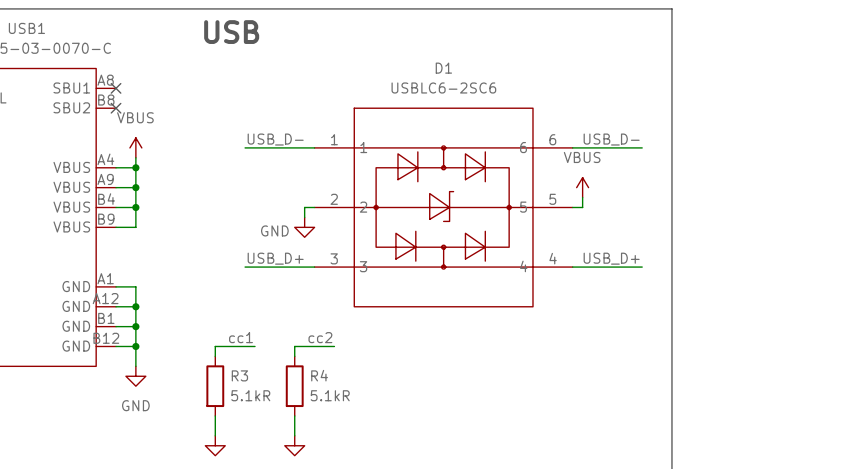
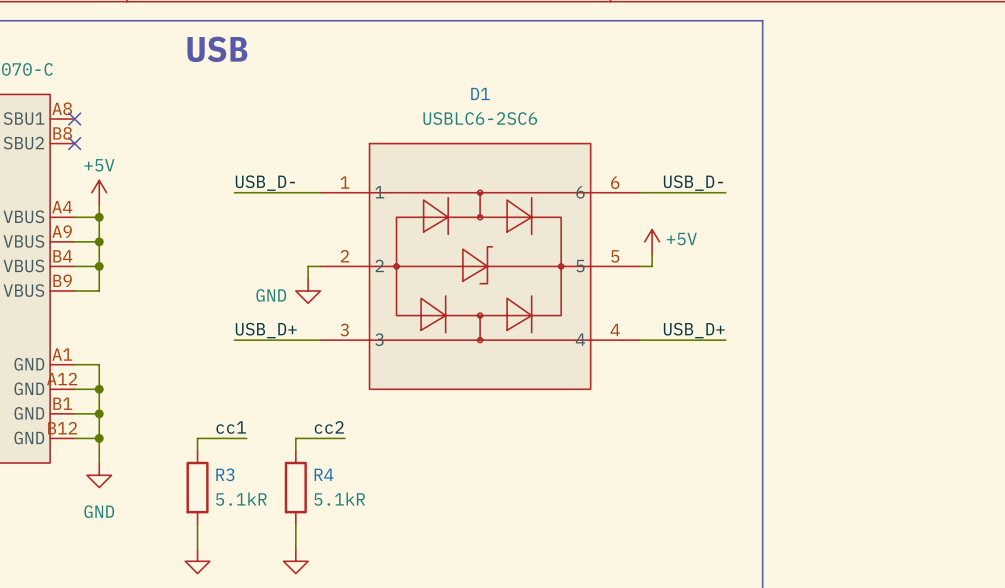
power symbol: VBUS (135, 147) -> +5V (99, 192)
power symbol: VBUS (582, 187) -> +5V (652, 241)

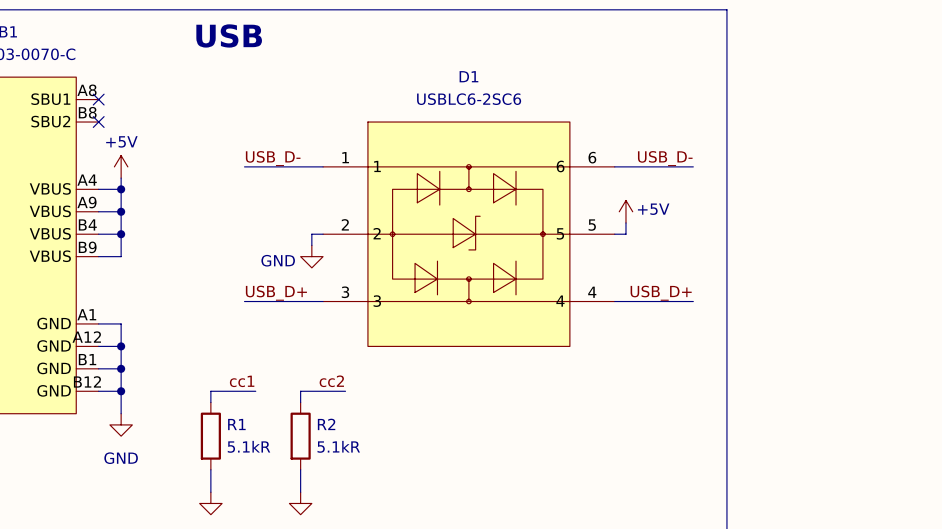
R3 name: R3 (225, 474) -> R1 (236, 424)
R4 name: R4 (324, 474) -> R2 (326, 424)

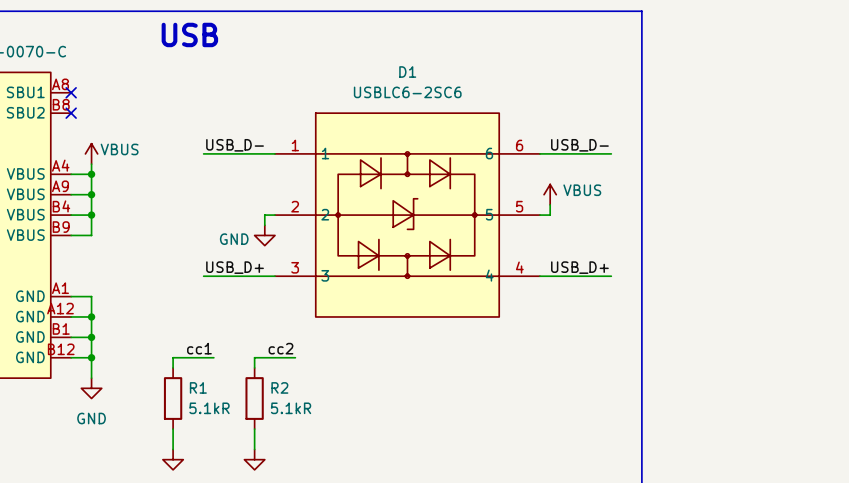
power symbol: +5V (121, 166) -> VBUS (91, 153)
power symbol: +5V (625, 211) -> VBUS (550, 194)

